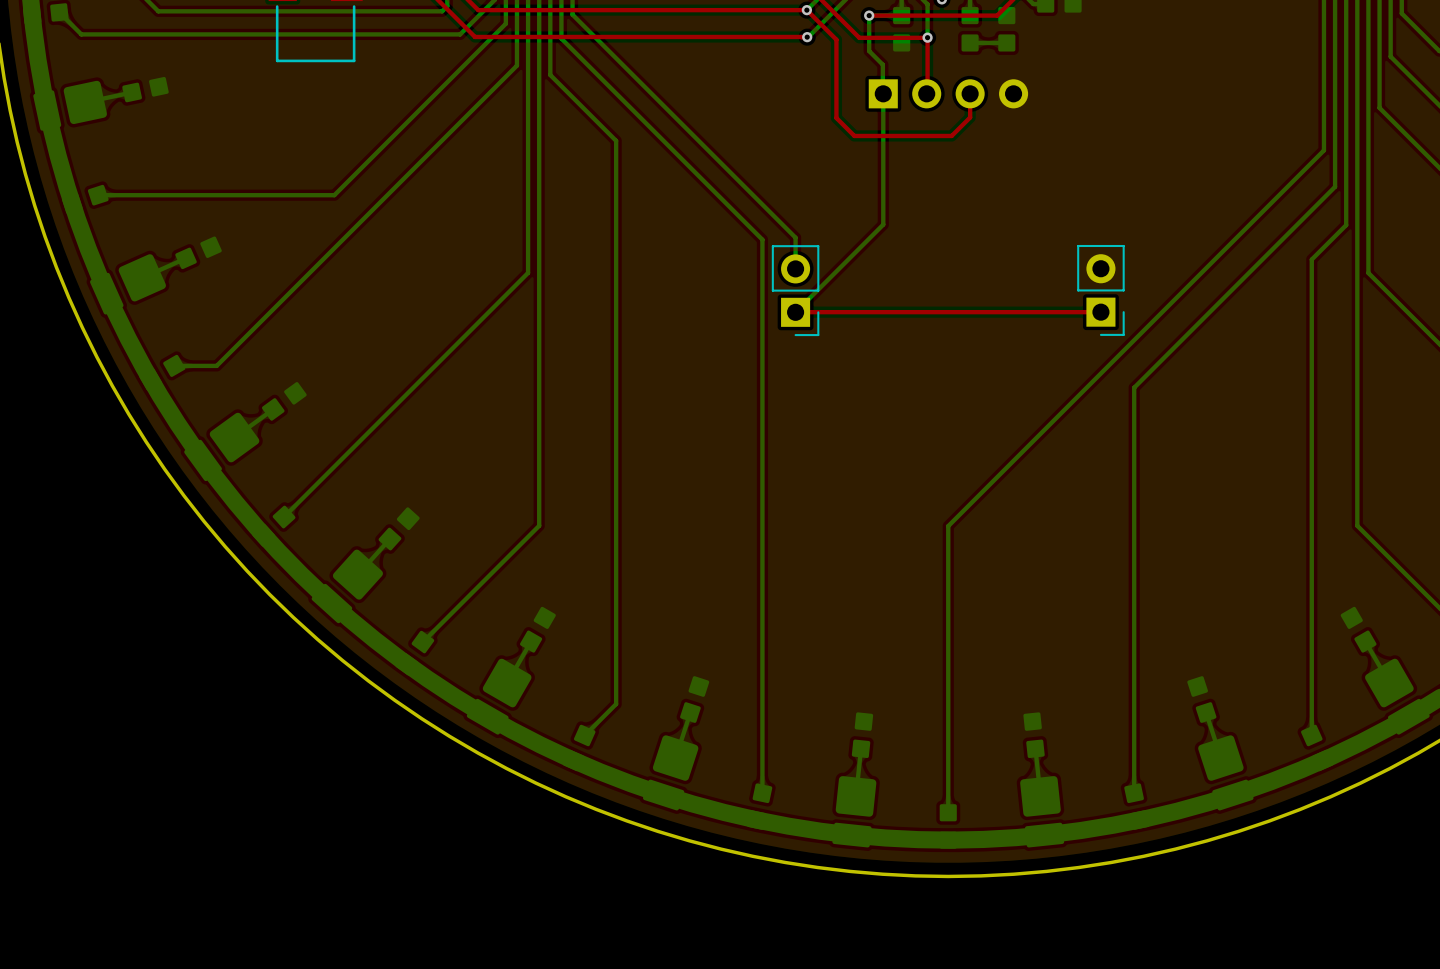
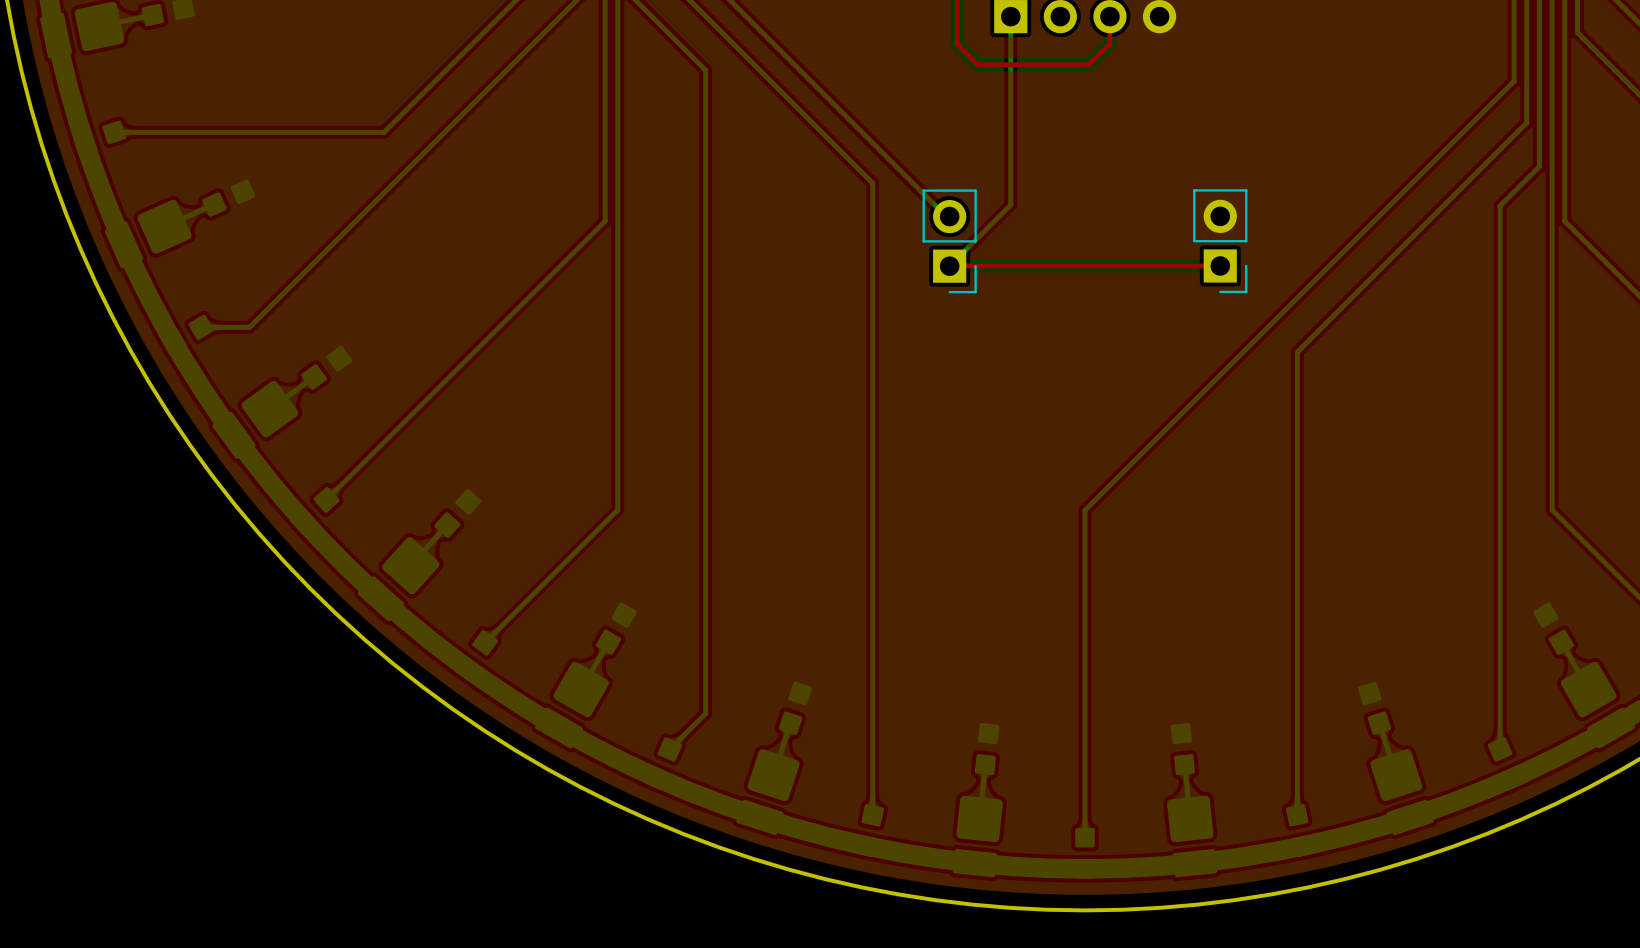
bottom track: (883, 224) (795, 312) -> (1010, 166) (1010, 205) (949, 266)
bottom track: (795, 237) (795, 268) -> (910, 180) (946, 216) (949, 216)
part position: (795, 290) -> (949, 241)
part position: (1100, 290) -> (1220, 241)
top track: (795, 312) (829, 312) -> none
top track: (1066, 312) (1100, 312) -> none

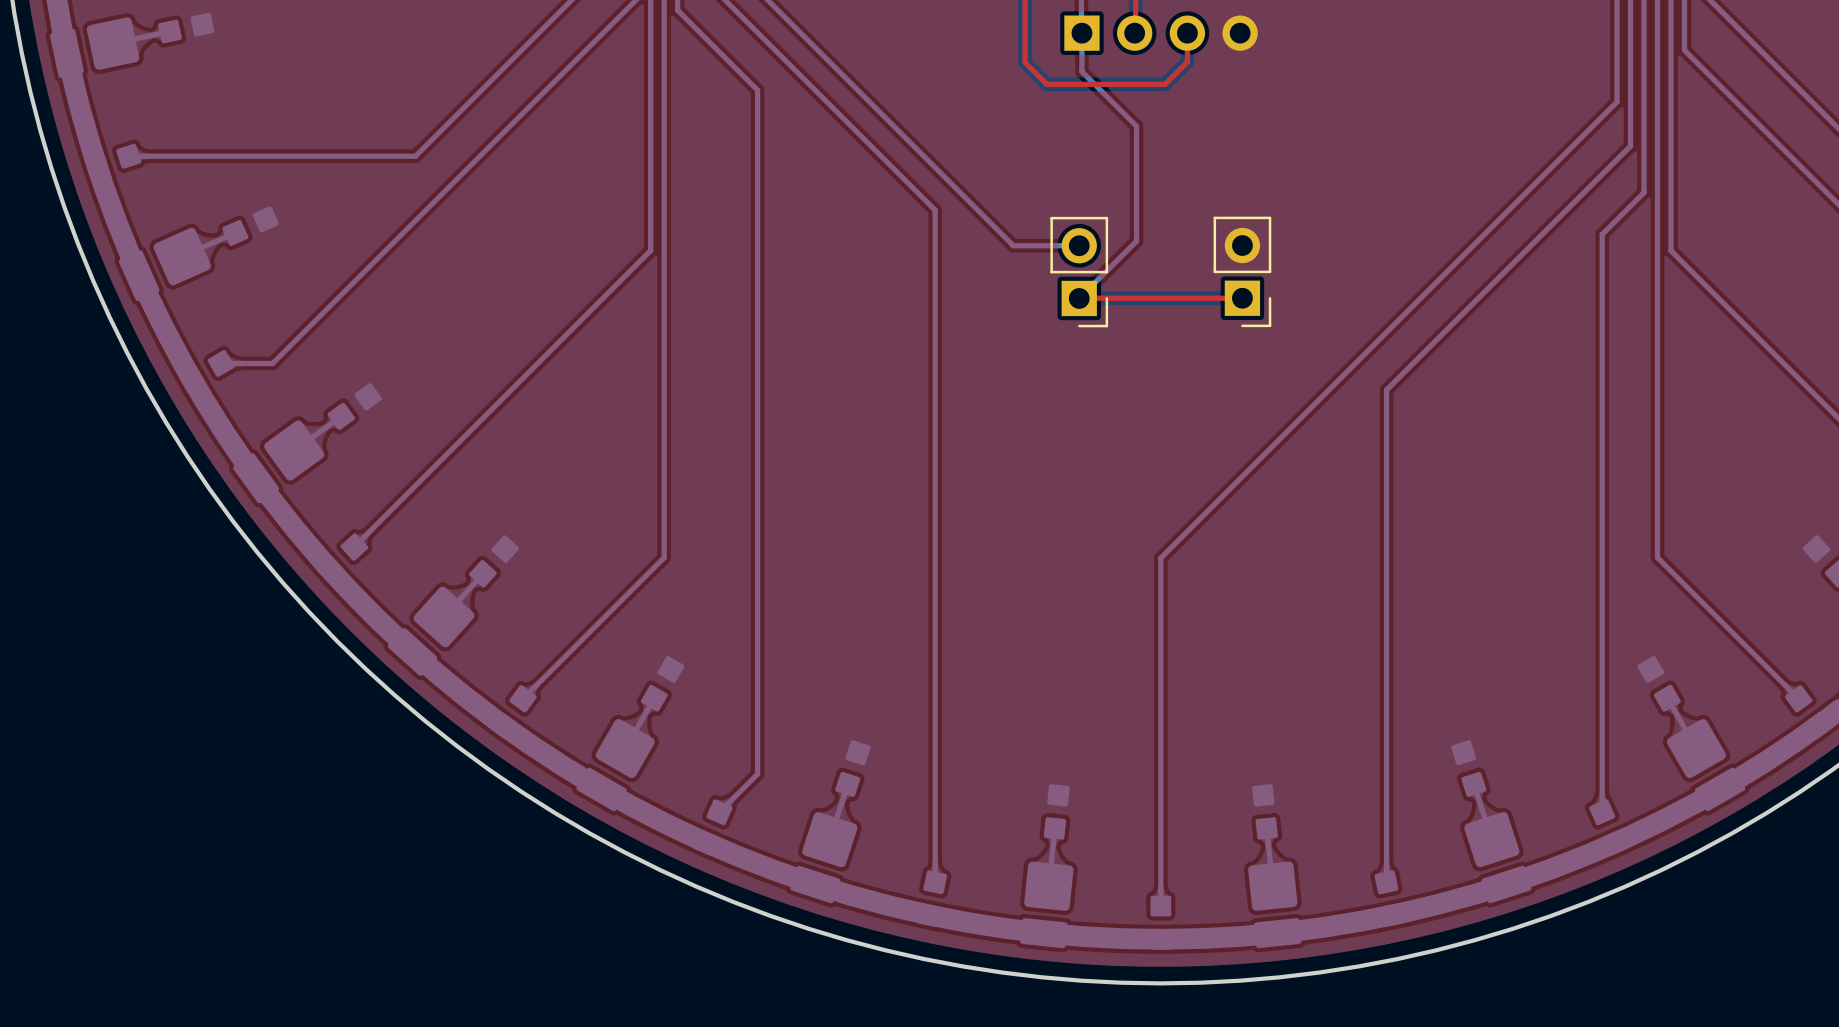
bottom track: (1010, 52) (1010, 205) (949, 266) -> (1081, 71) (1136, 126) (1136, 241) (1079, 298)
bottom track: none -> (1016, 245) (1079, 245)
part position: (949, 241) -> (1079, 272)
part position: (1220, 241) -> (1242, 271)
top track: (949, 265) (1008, 265) -> none
top track: (1161, 265) (1220, 265) -> none

